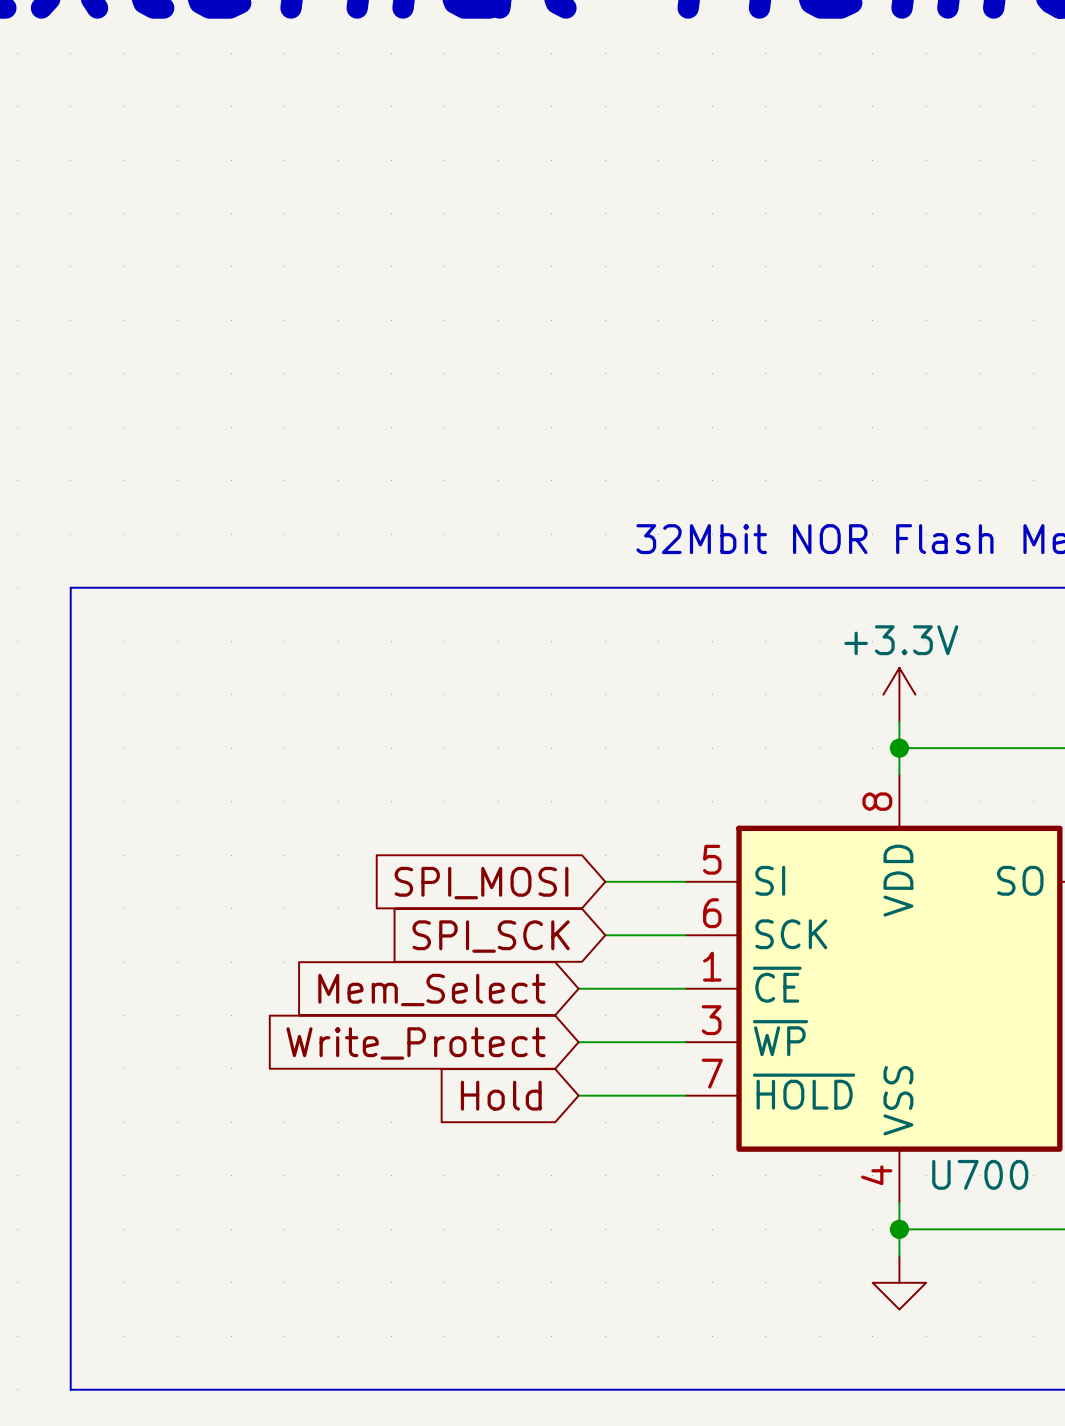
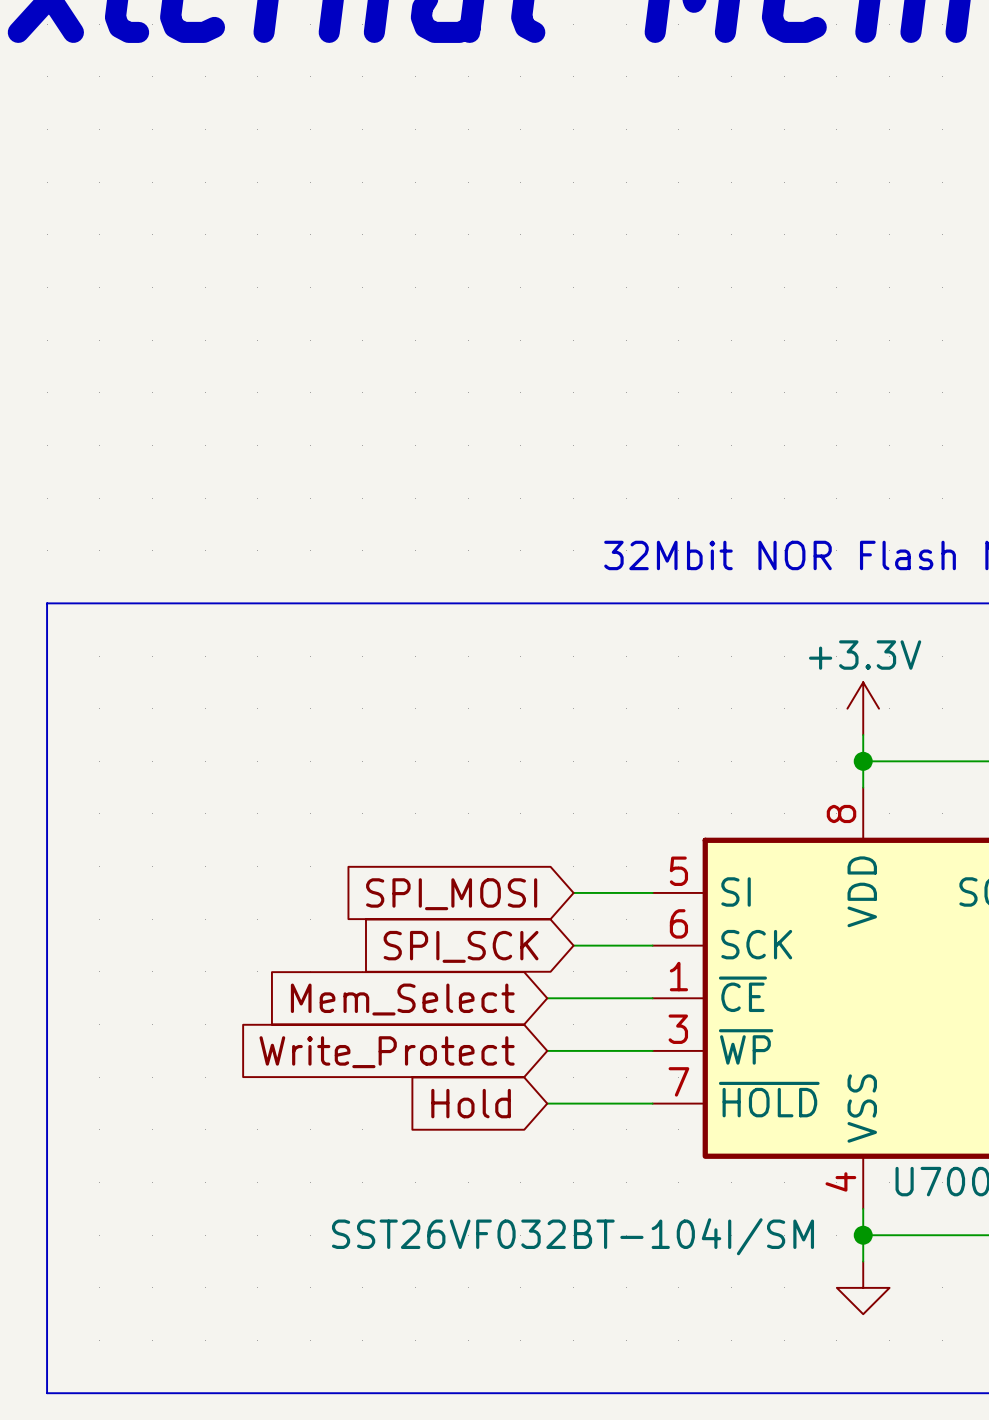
U700 value: none -> SST26VF032BT-104I/SM (572, 1236)

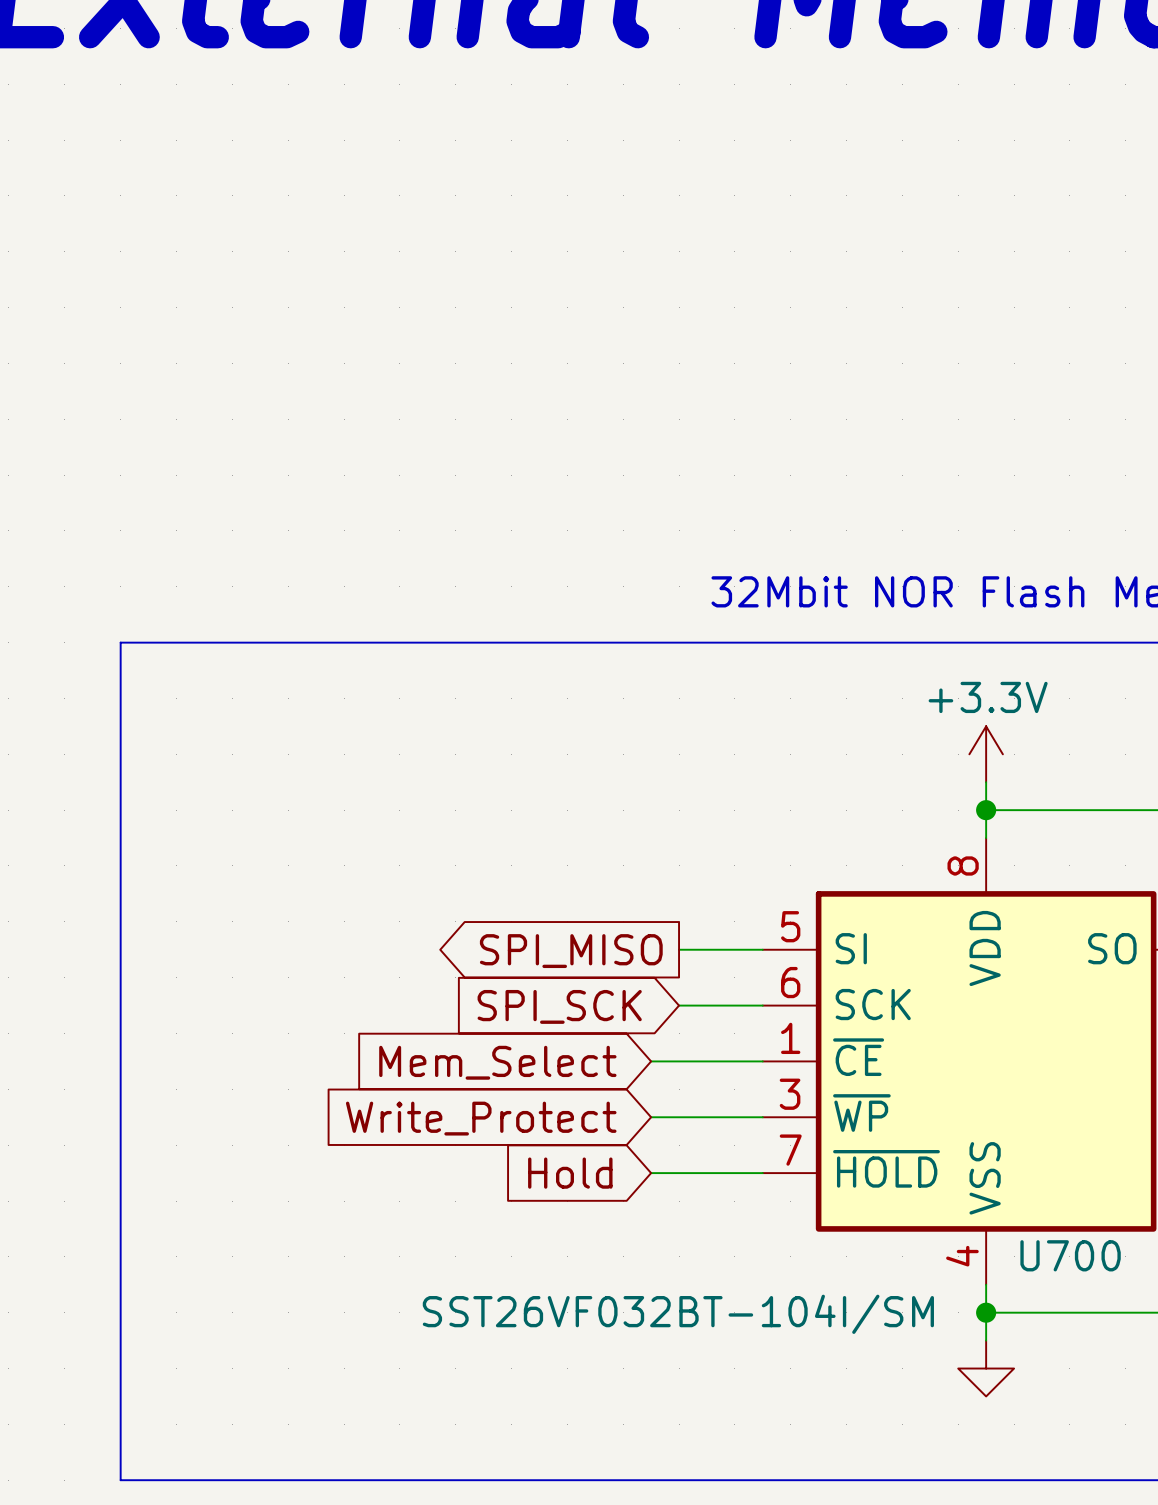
global label shape: input (451, 894) -> output (571, 951)
global label: SPI_MOSI (451, 894) -> SPI_MISO (571, 951)

